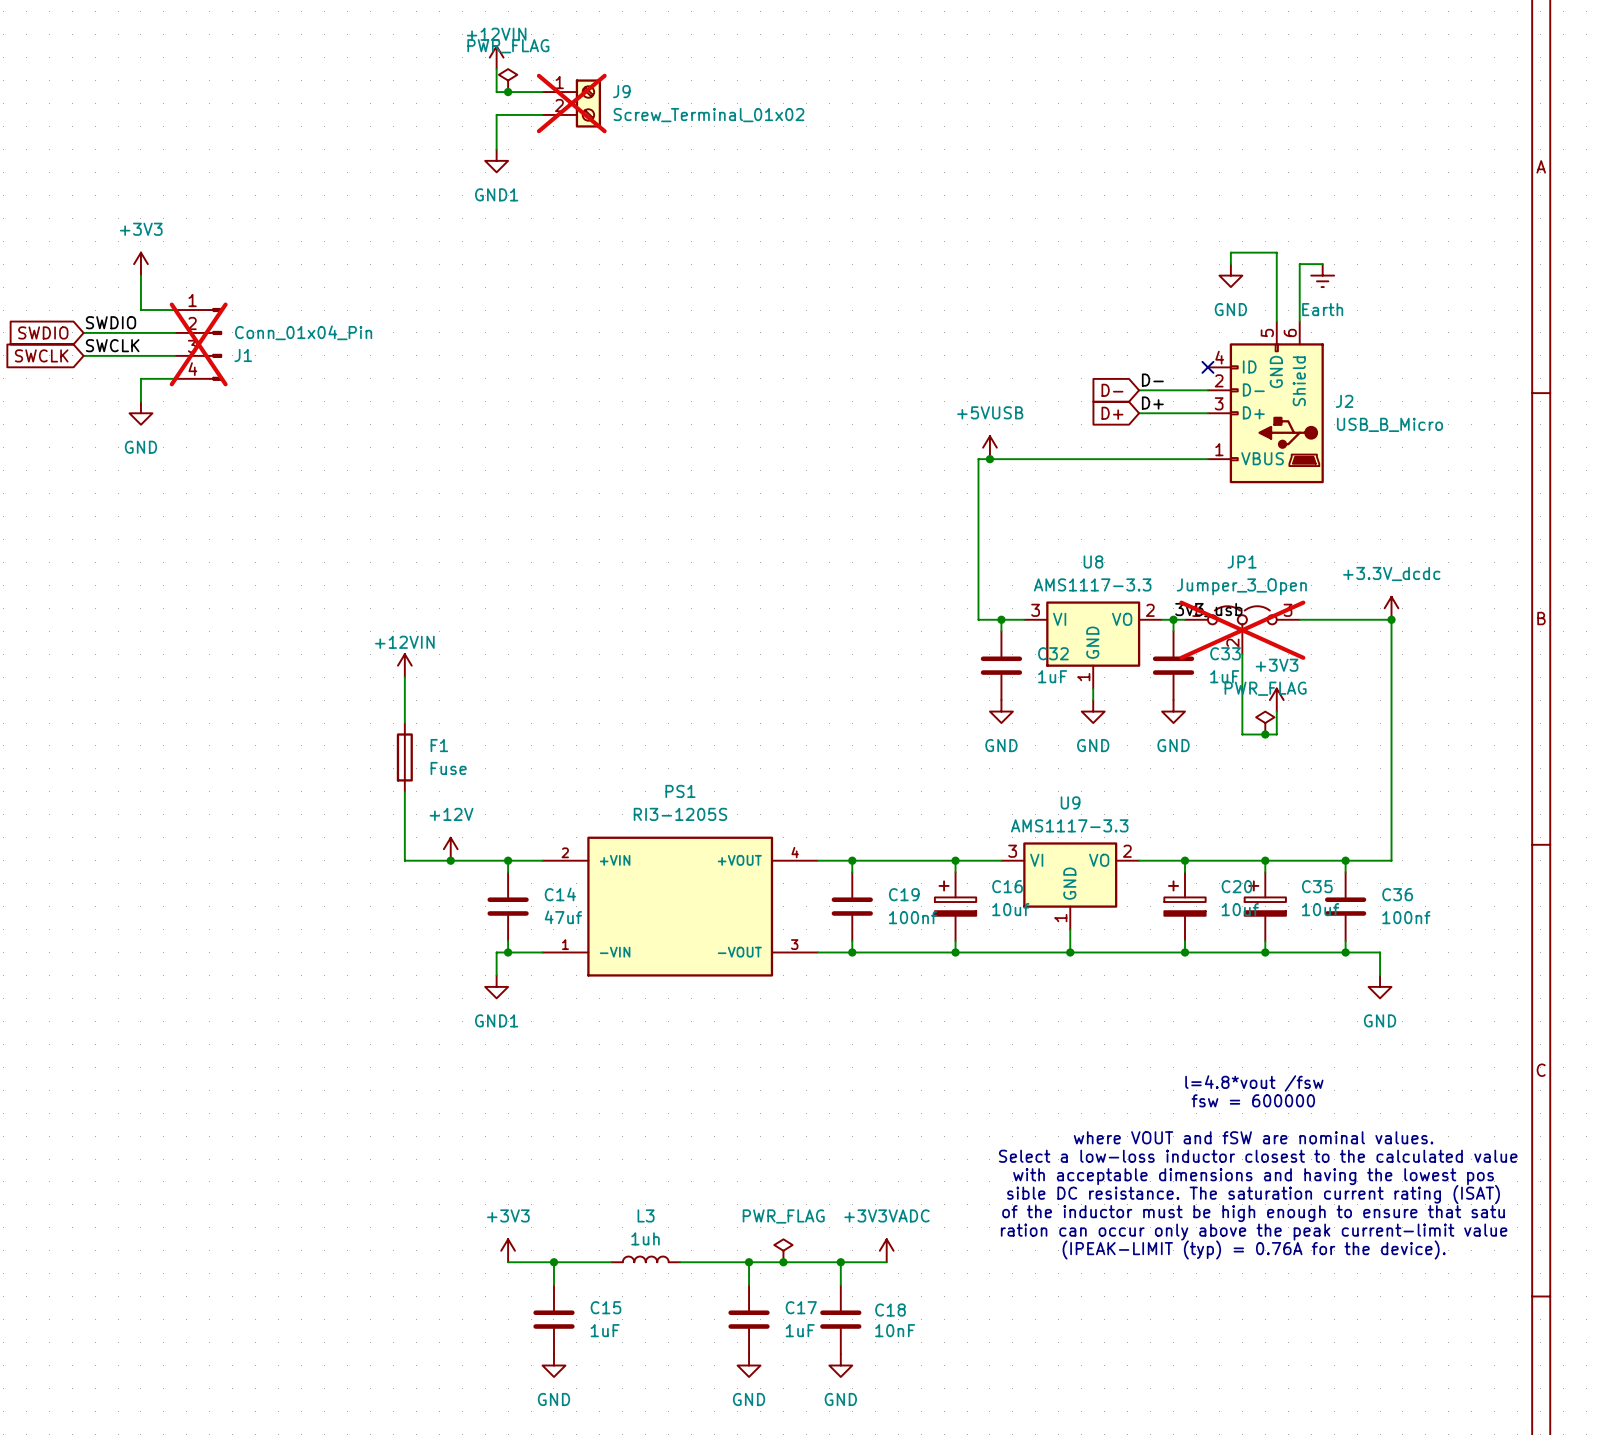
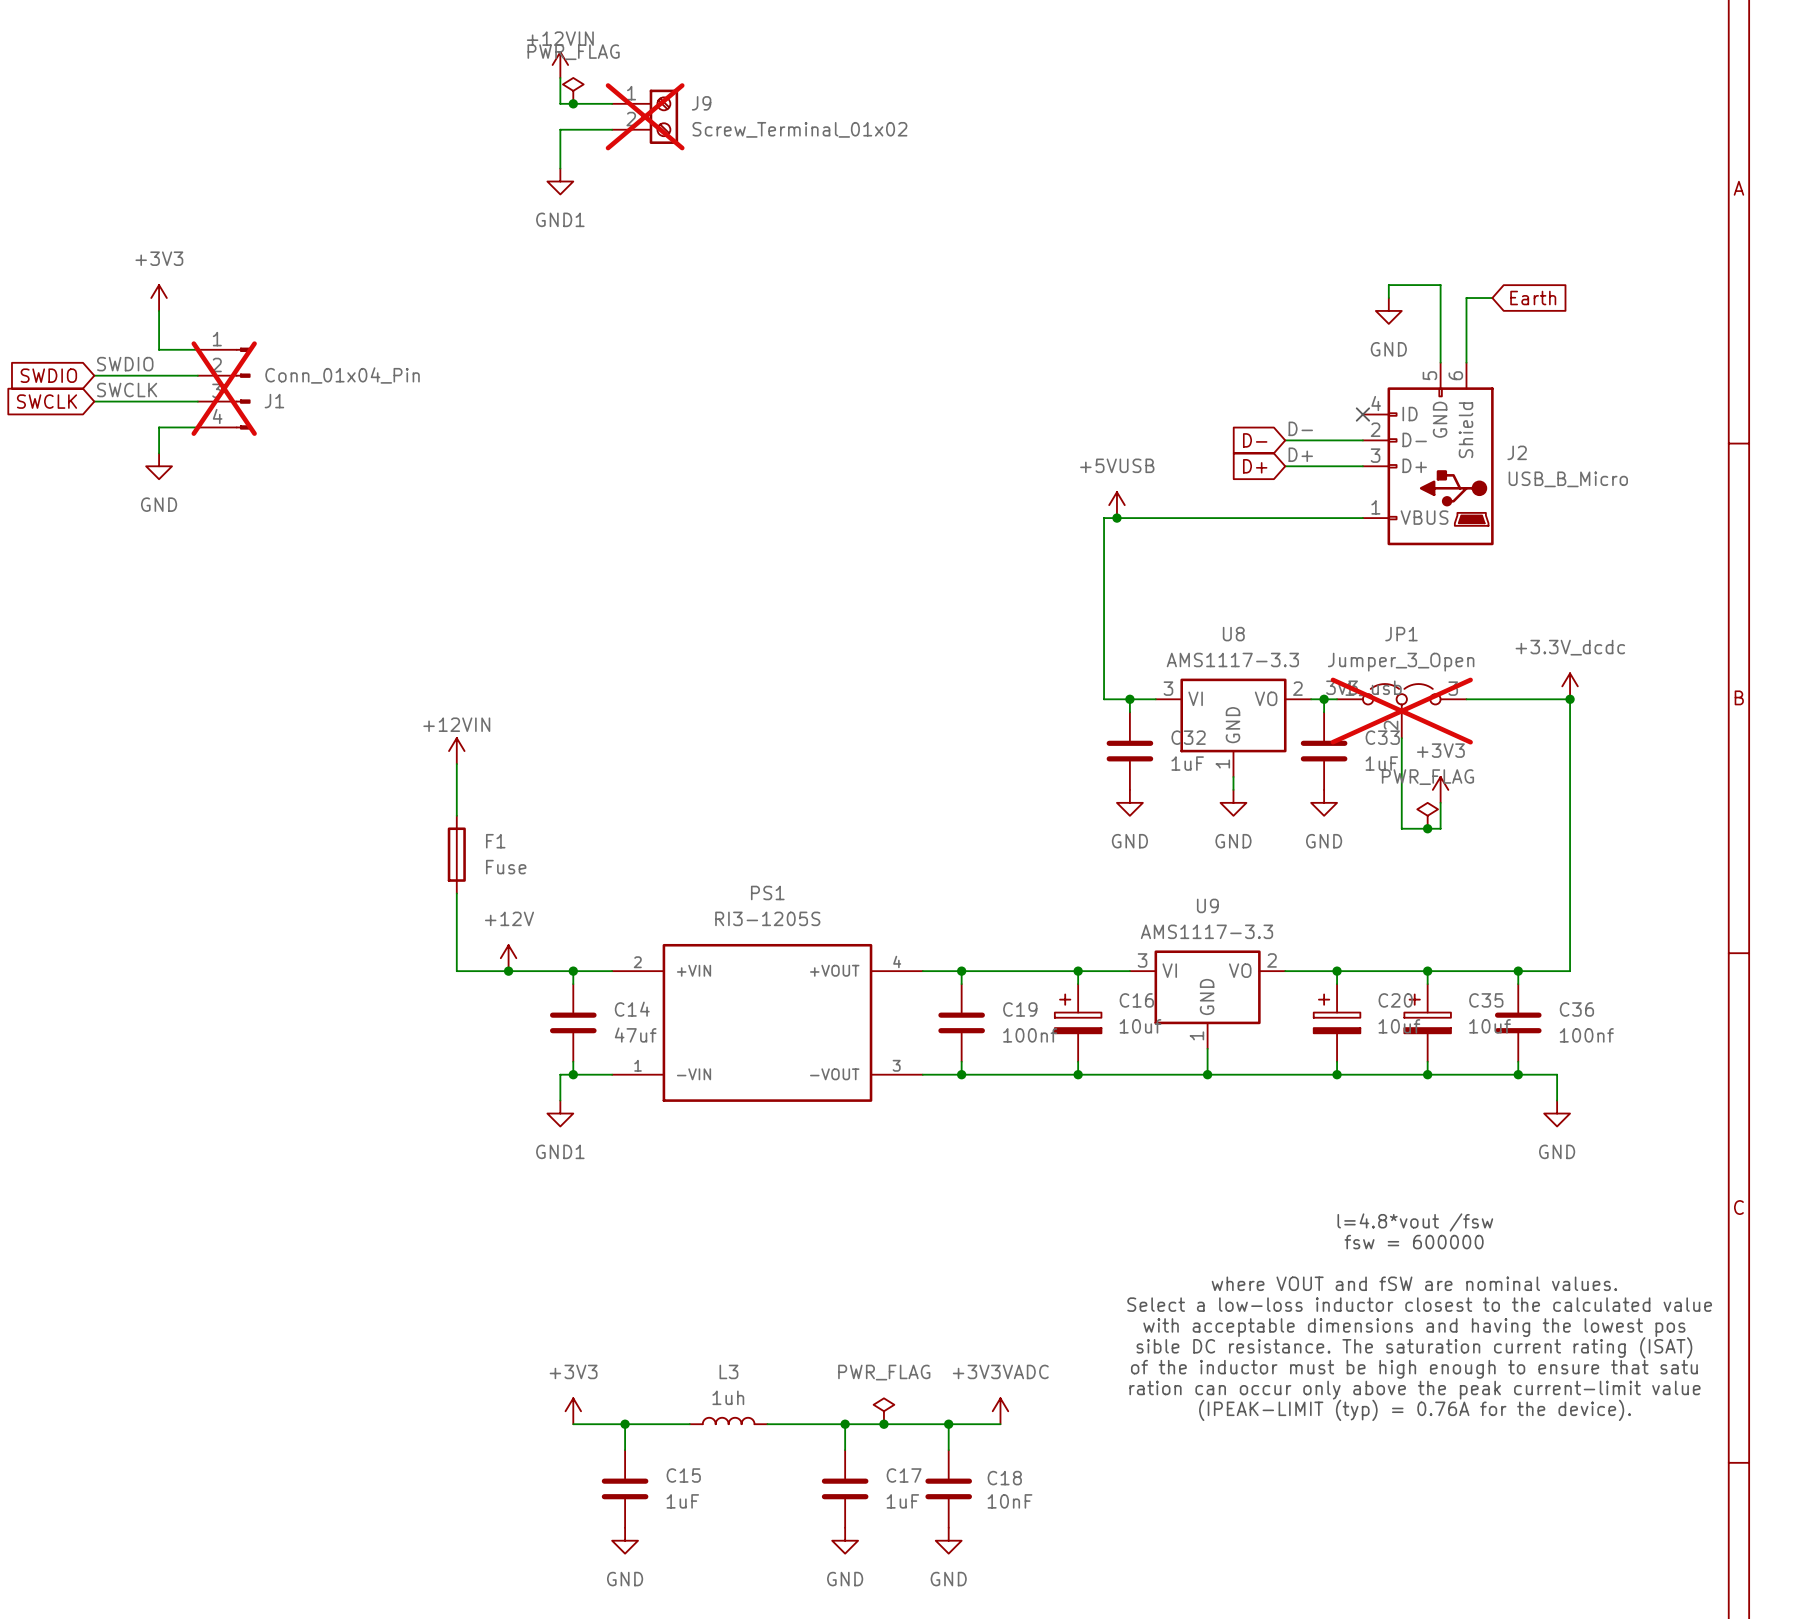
global label: none -> Earth (1533, 298)
power symbol: Earth (1322, 275) -> none

